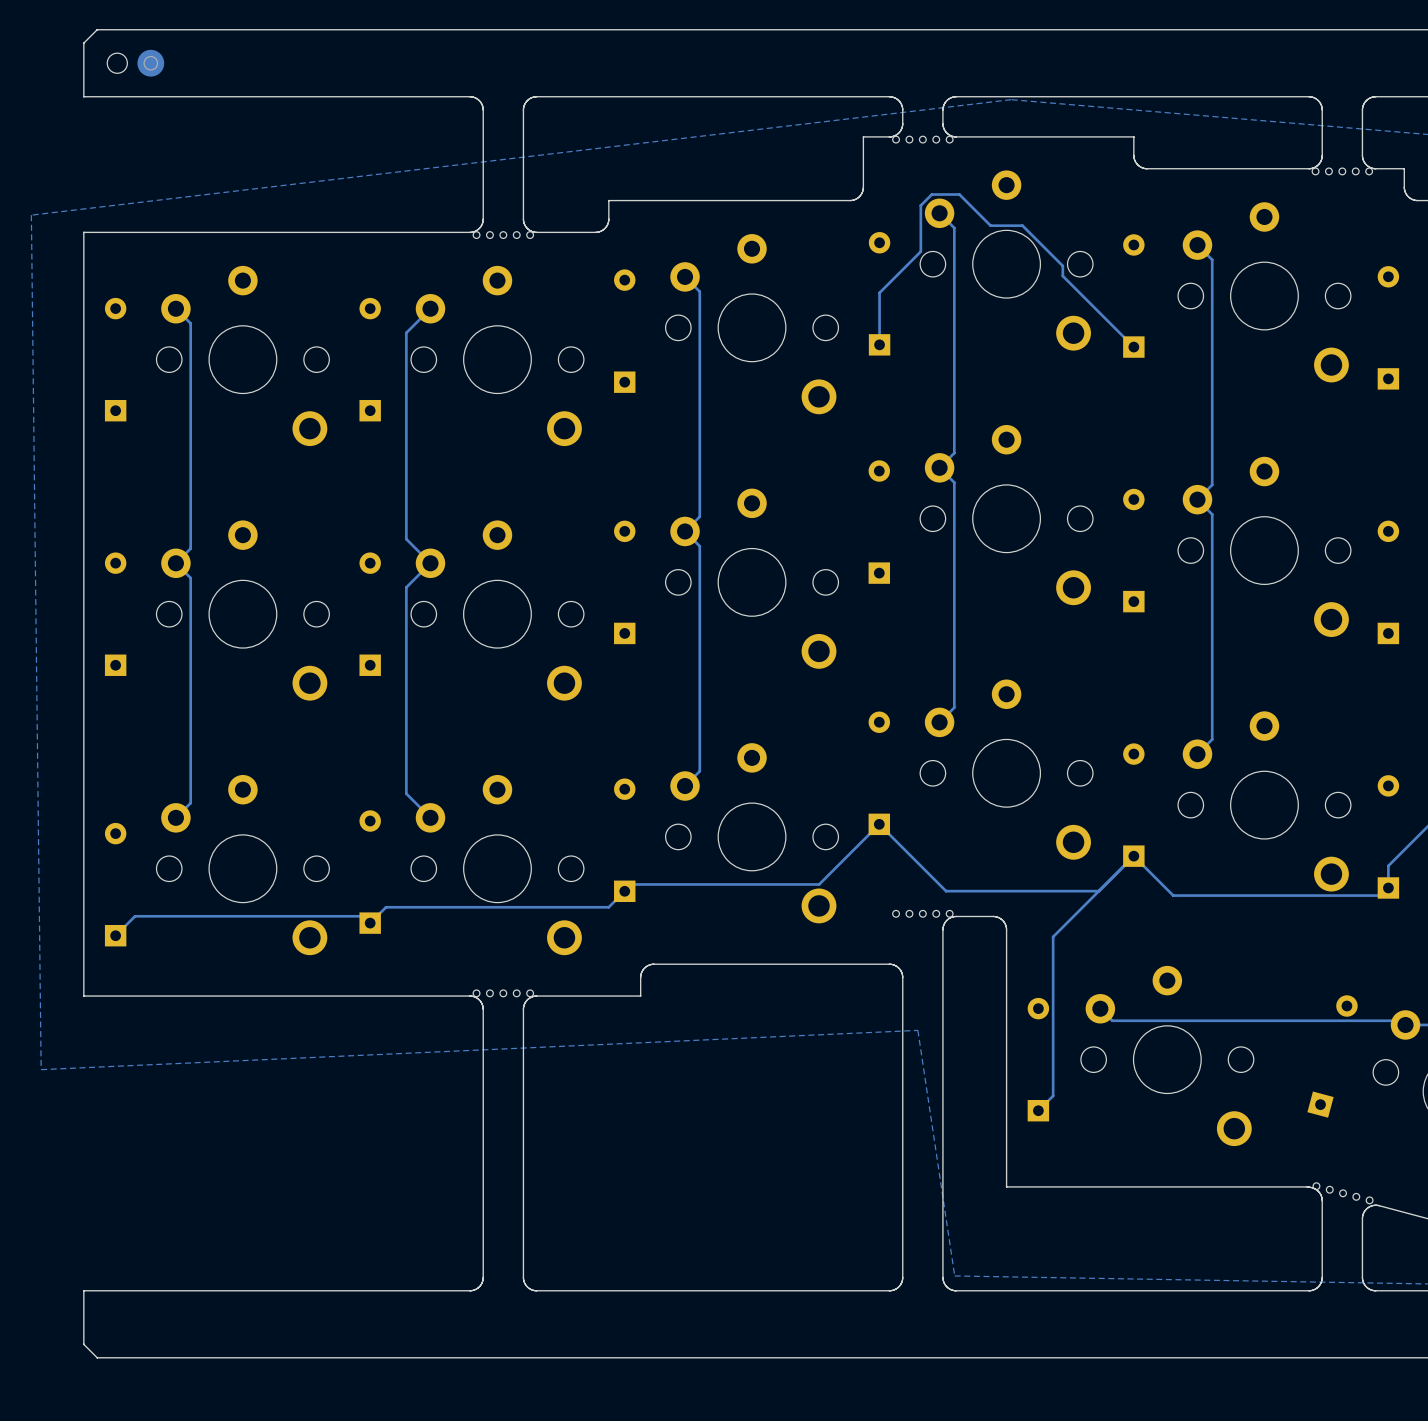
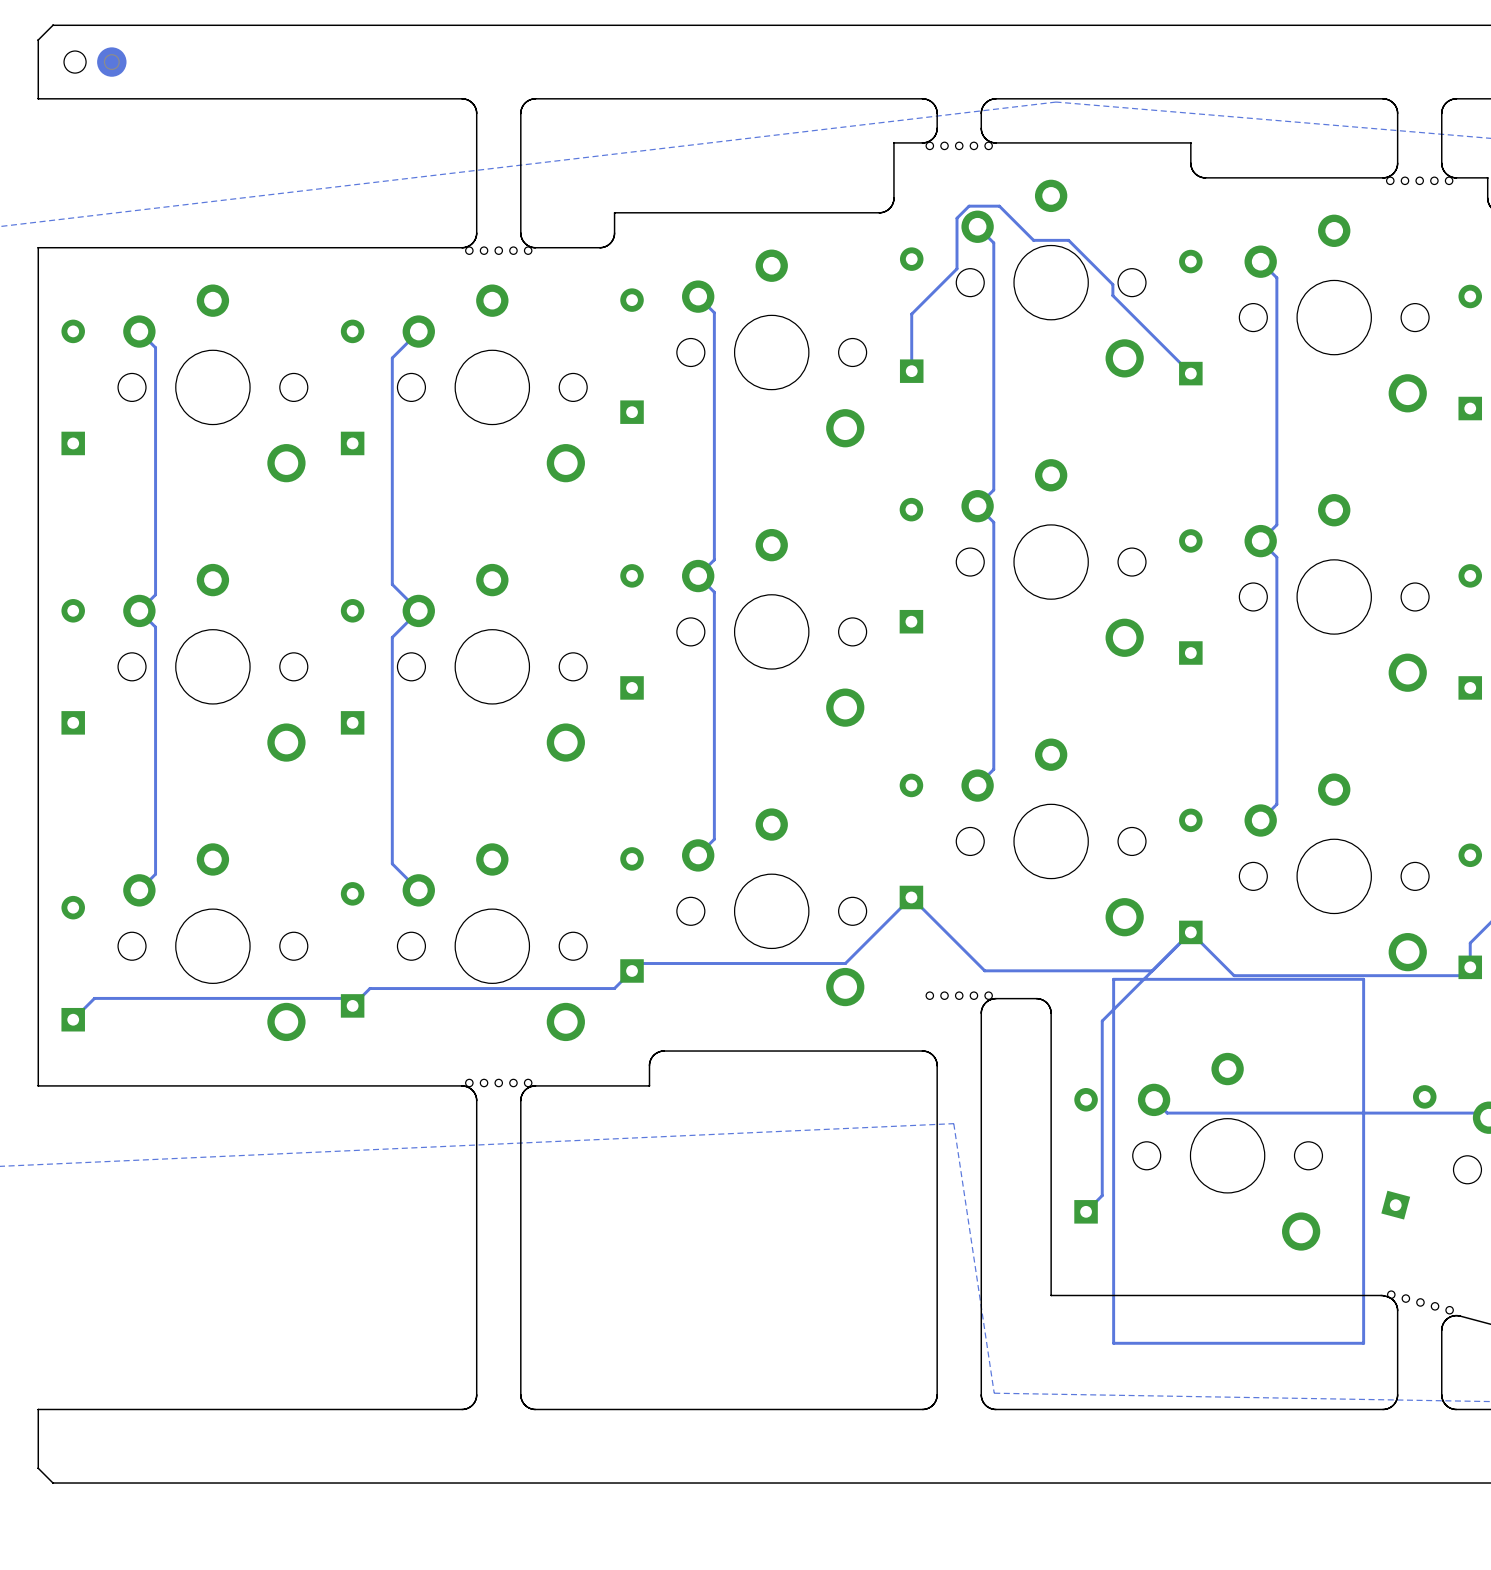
track: none -> (1363, 979) (1113, 979) (1113, 1343) (1363, 1343) (1363, 979)

